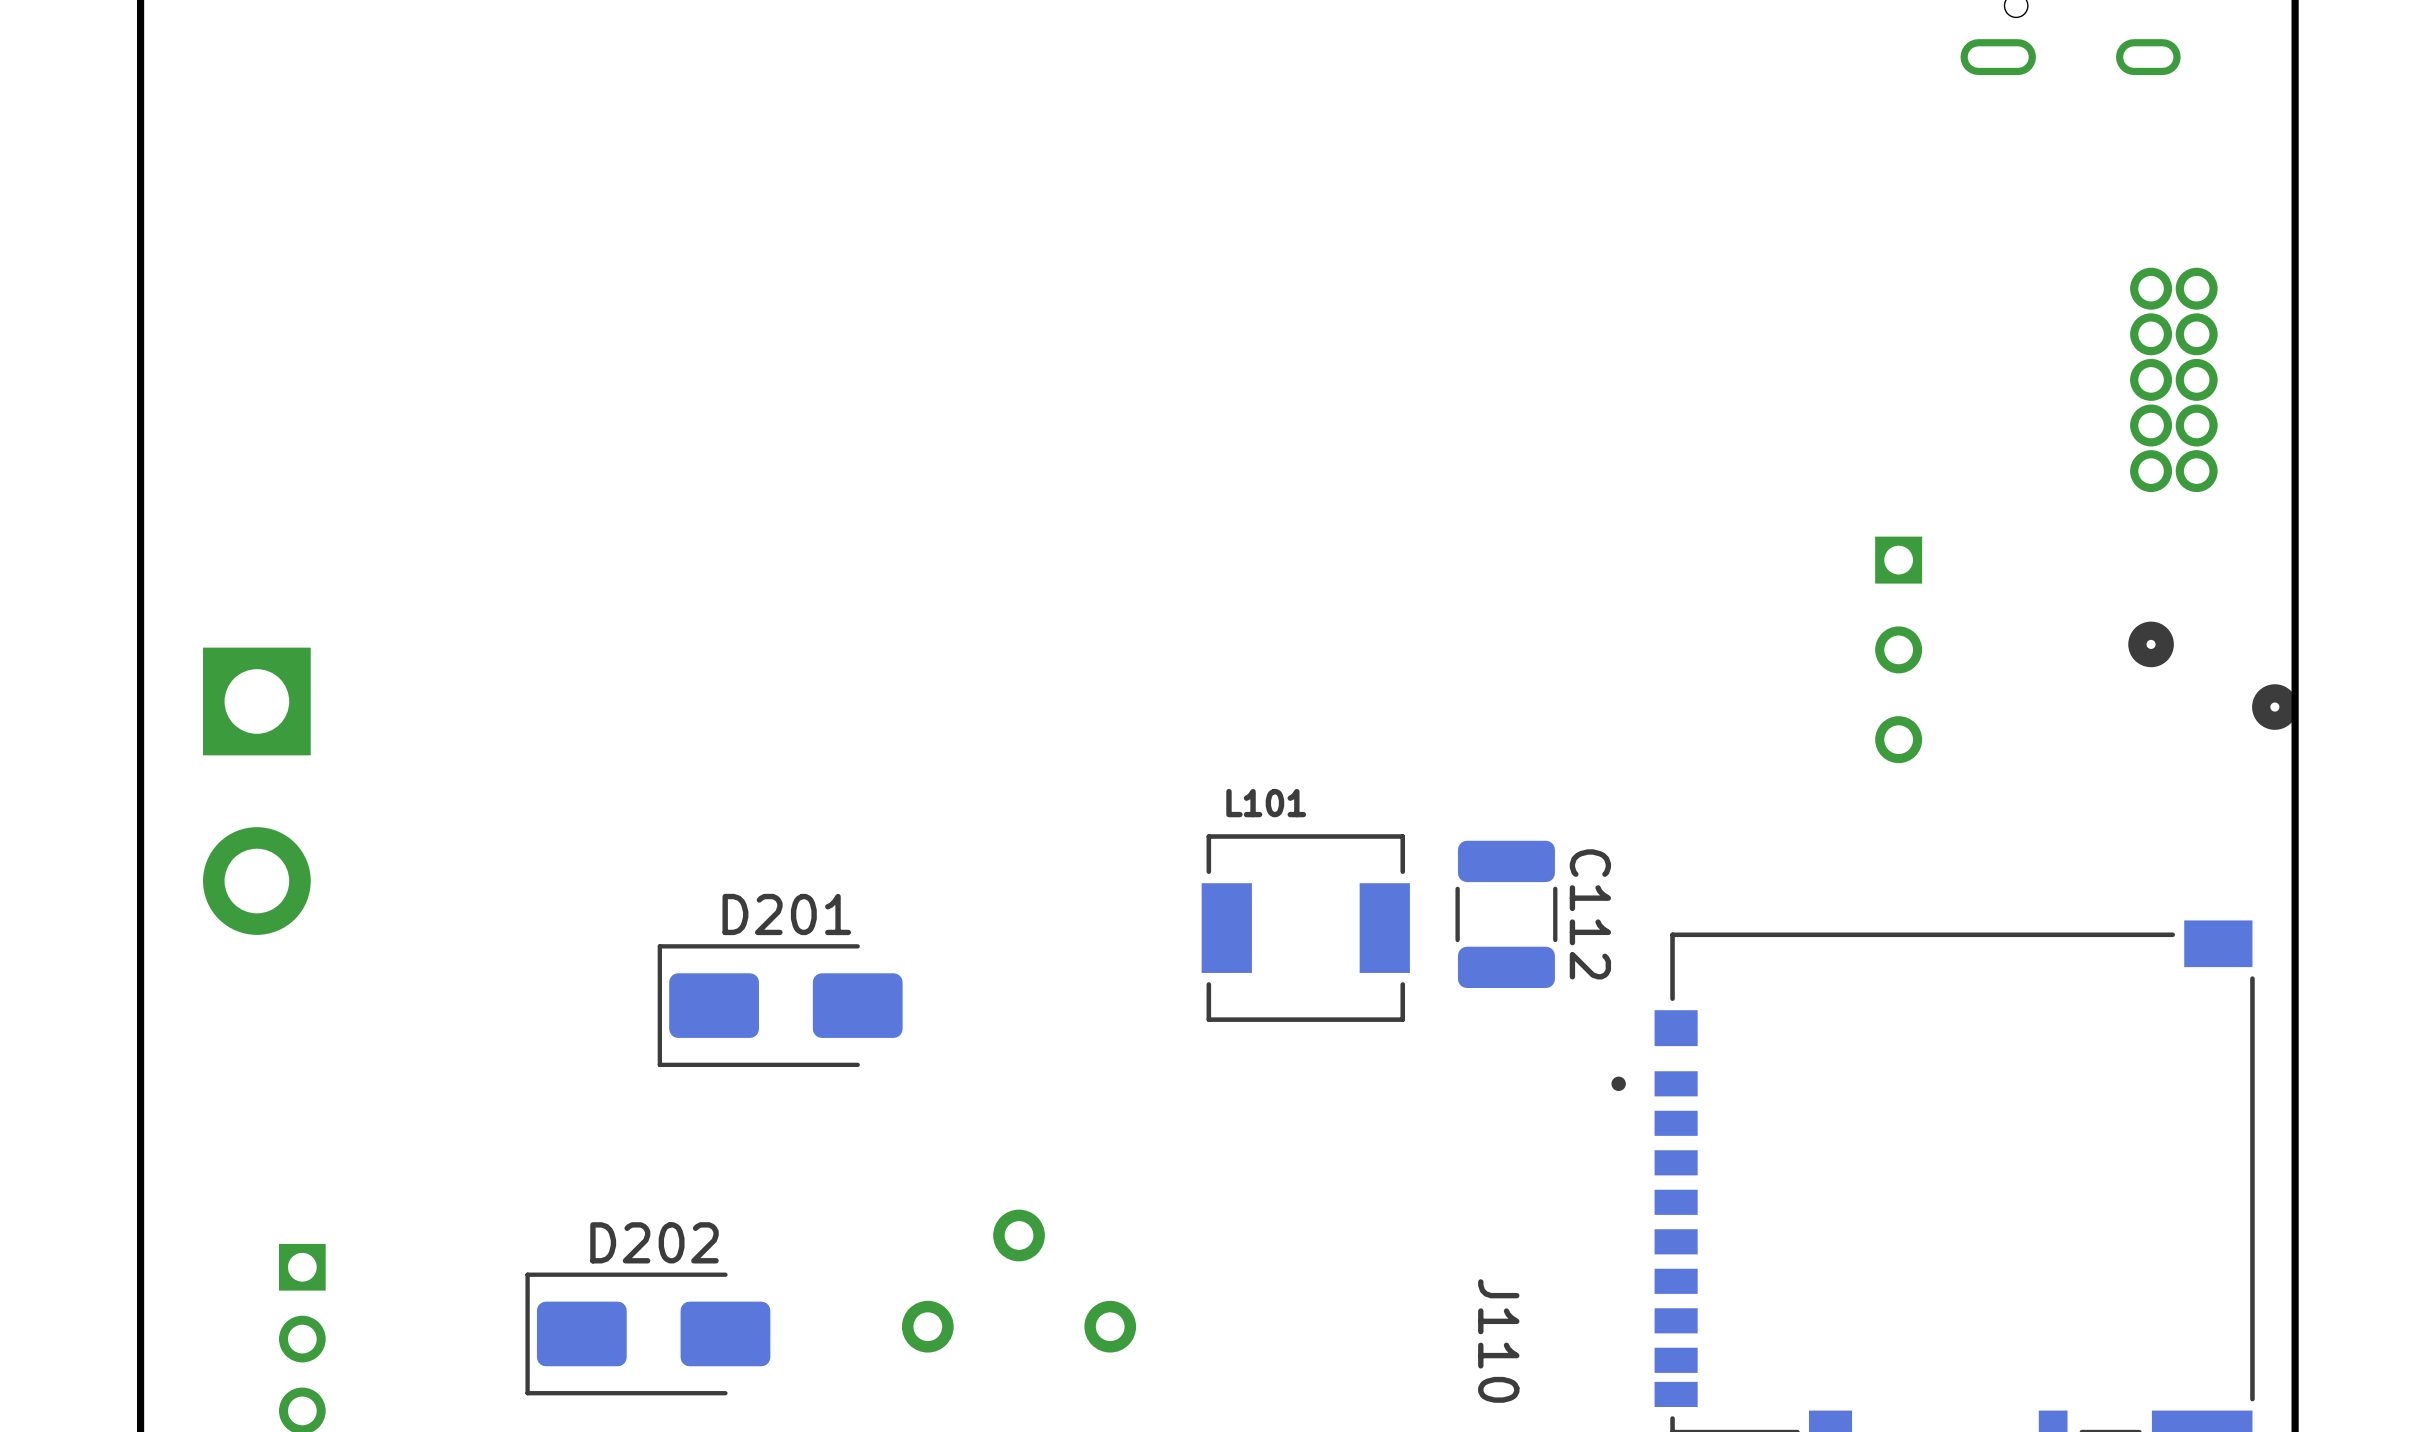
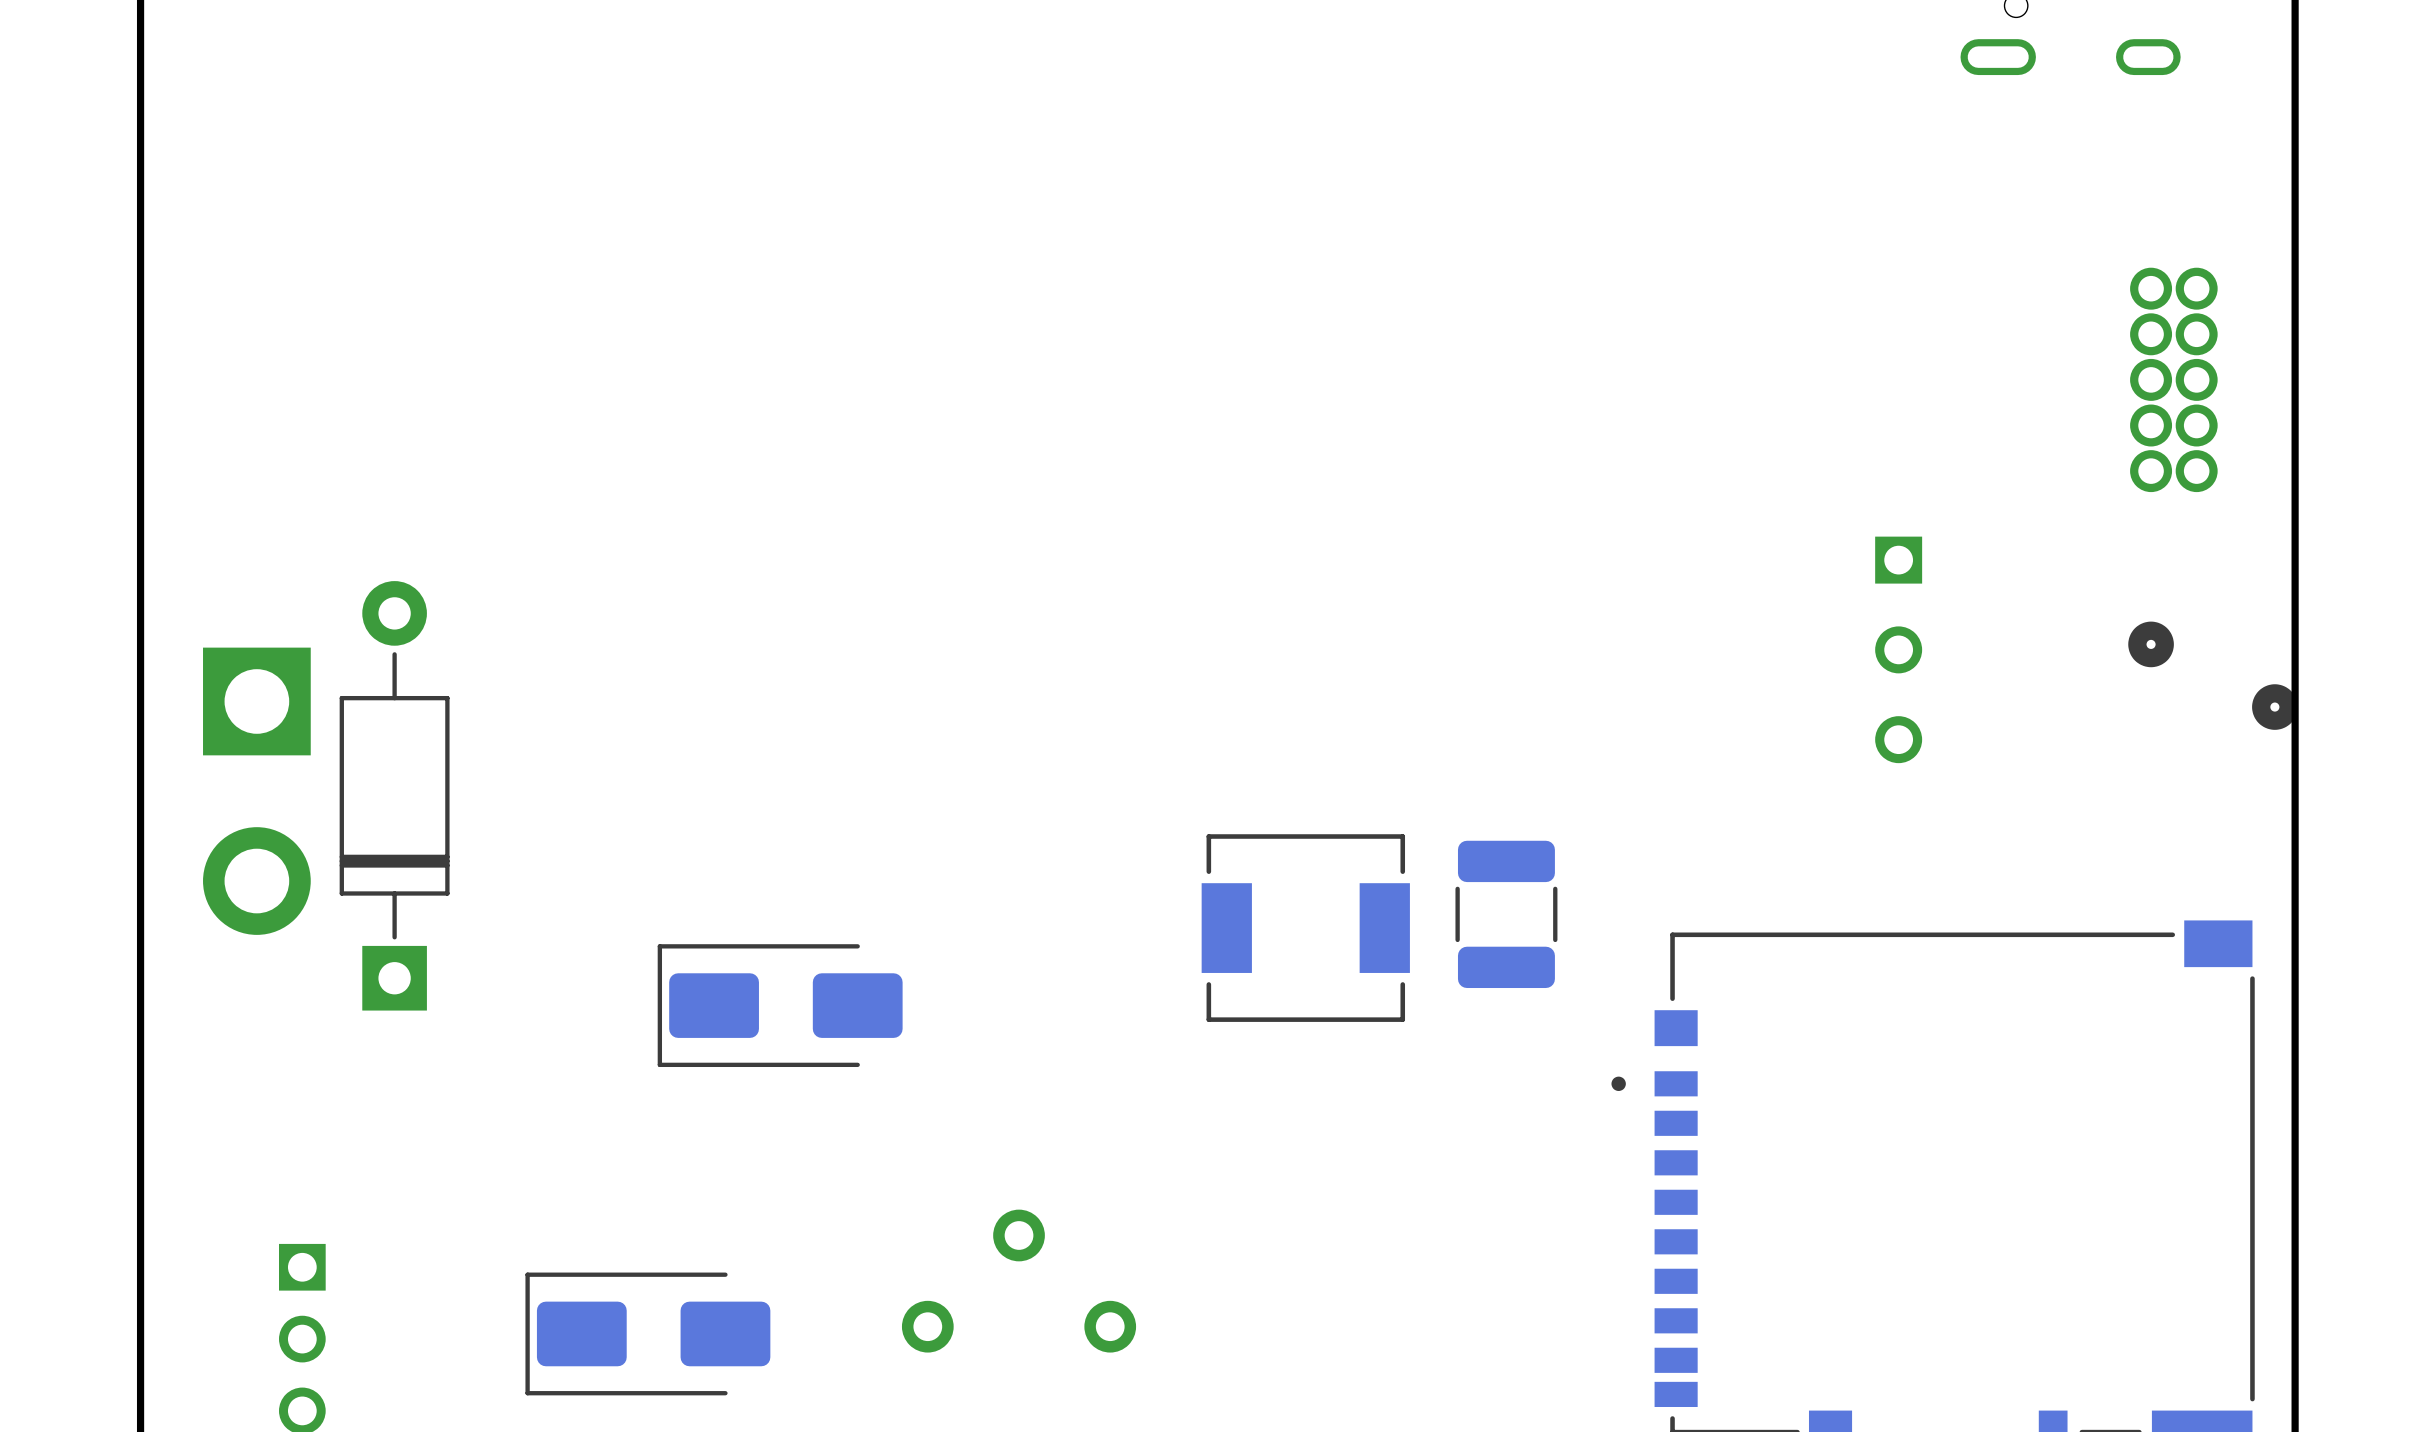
part: none -> (394, 795)
L101 name: L101 (1266, 803) -> none
D201 name: D201 (786, 914) -> none
C112 name: C112 (1590, 914) -> none
D202 name: D202 (654, 1242) -> none
J110 name: J110 (1498, 1341) -> none

